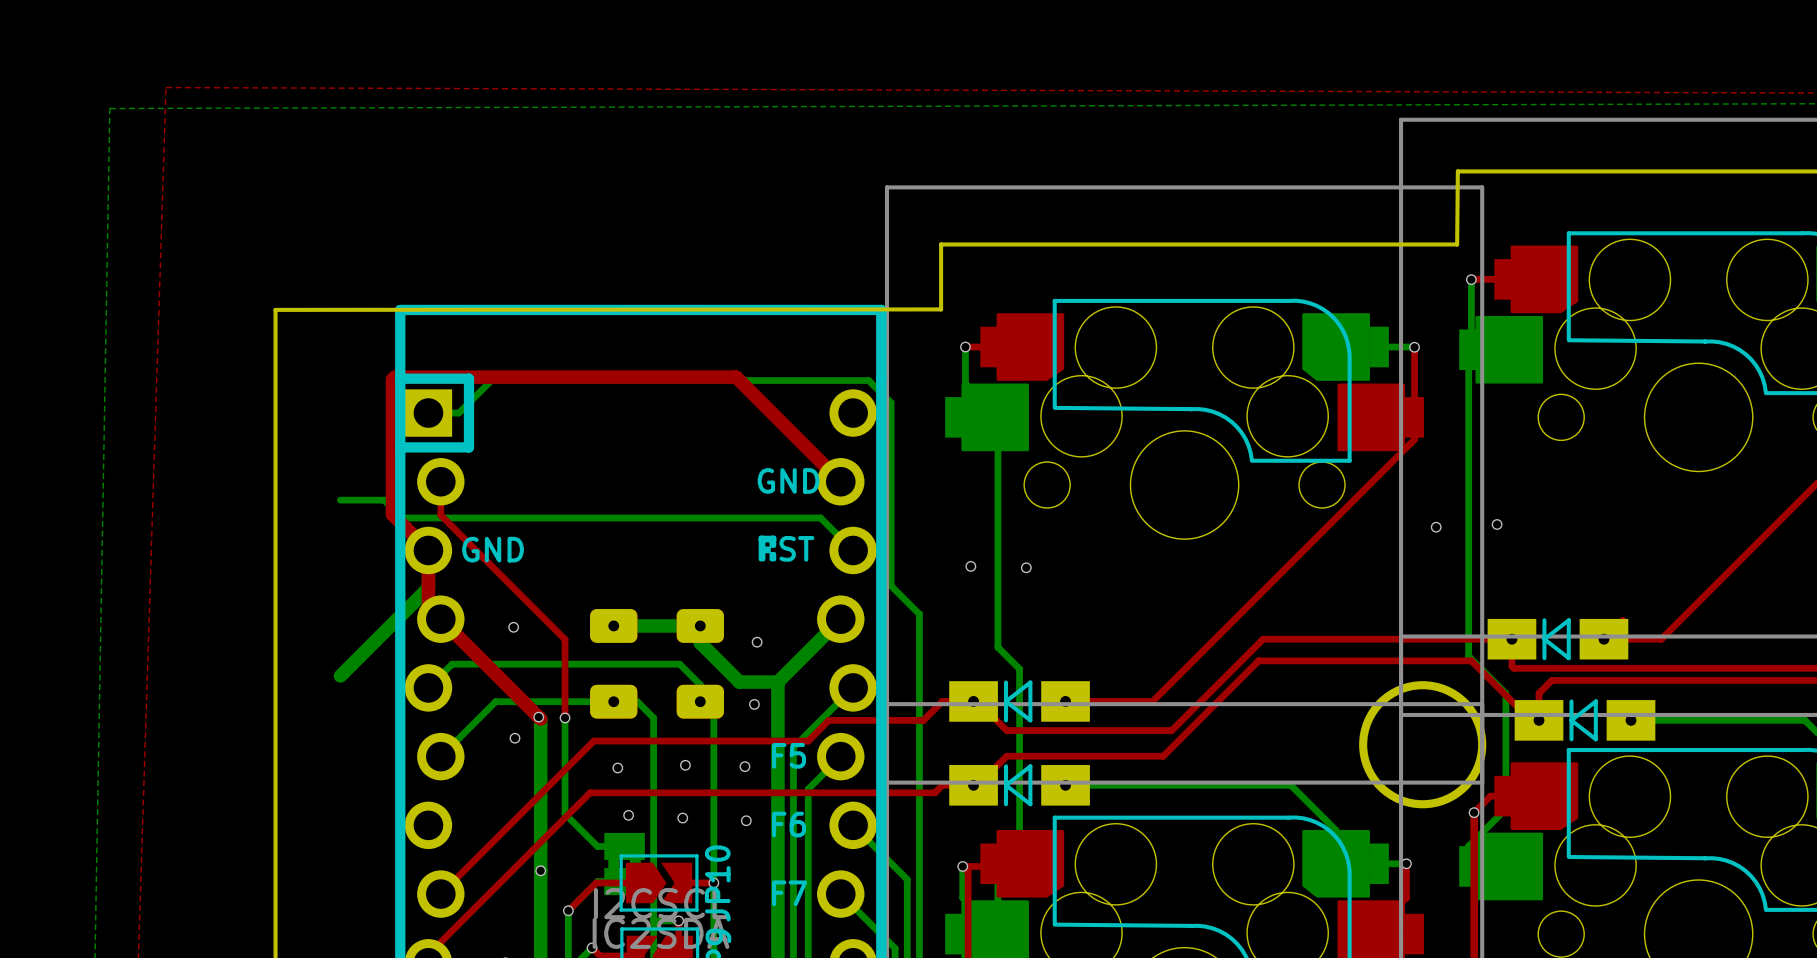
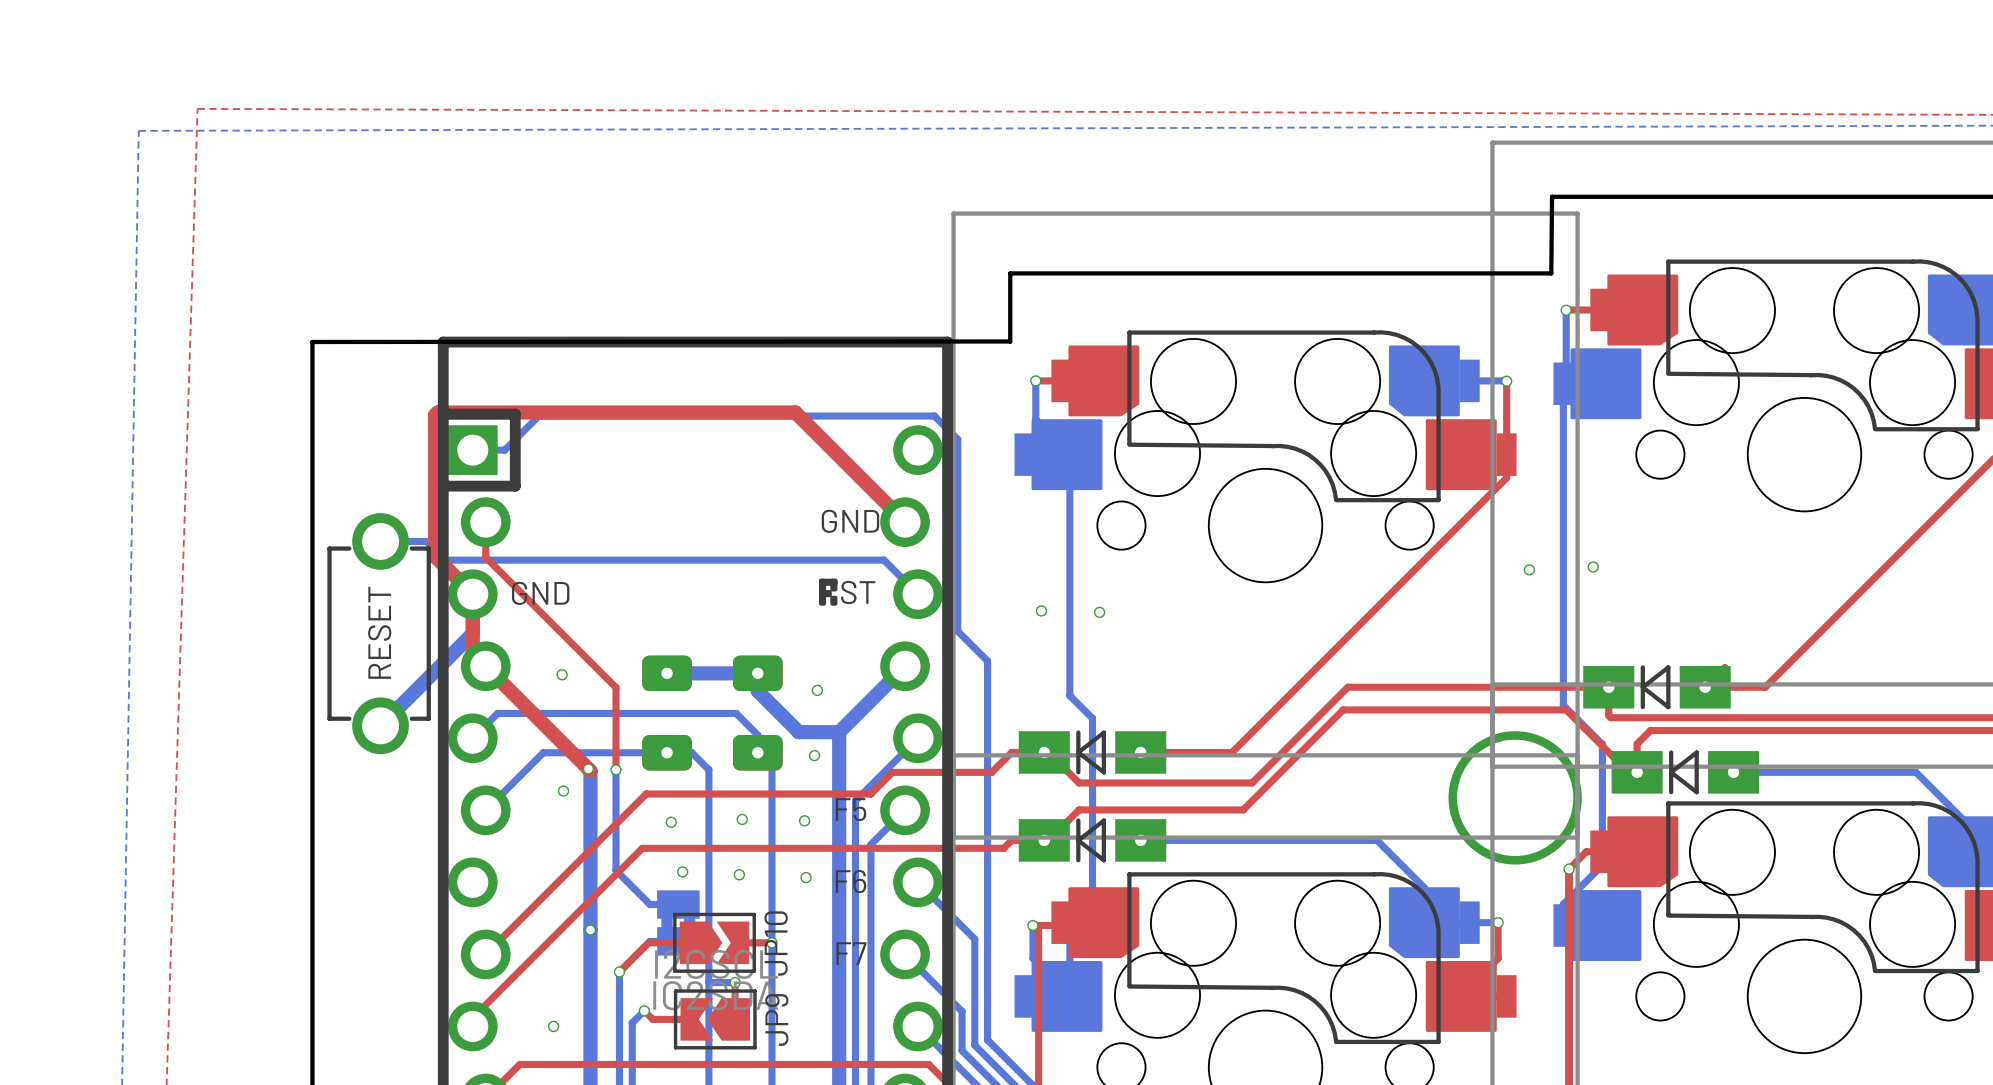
part: none -> (379, 633)

